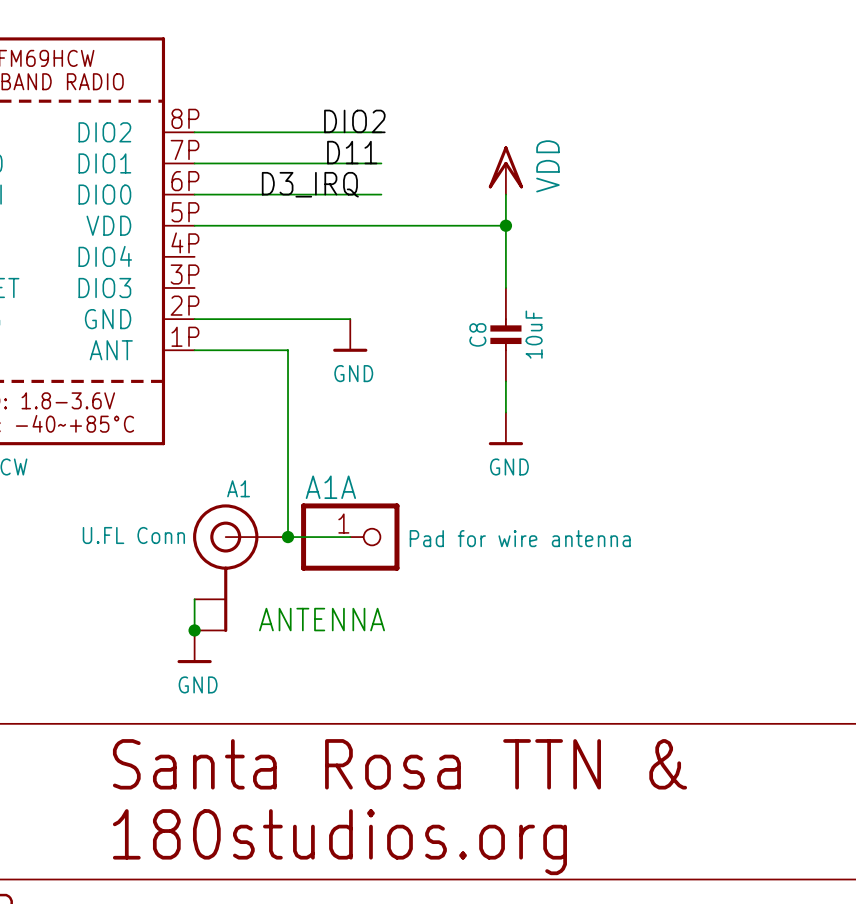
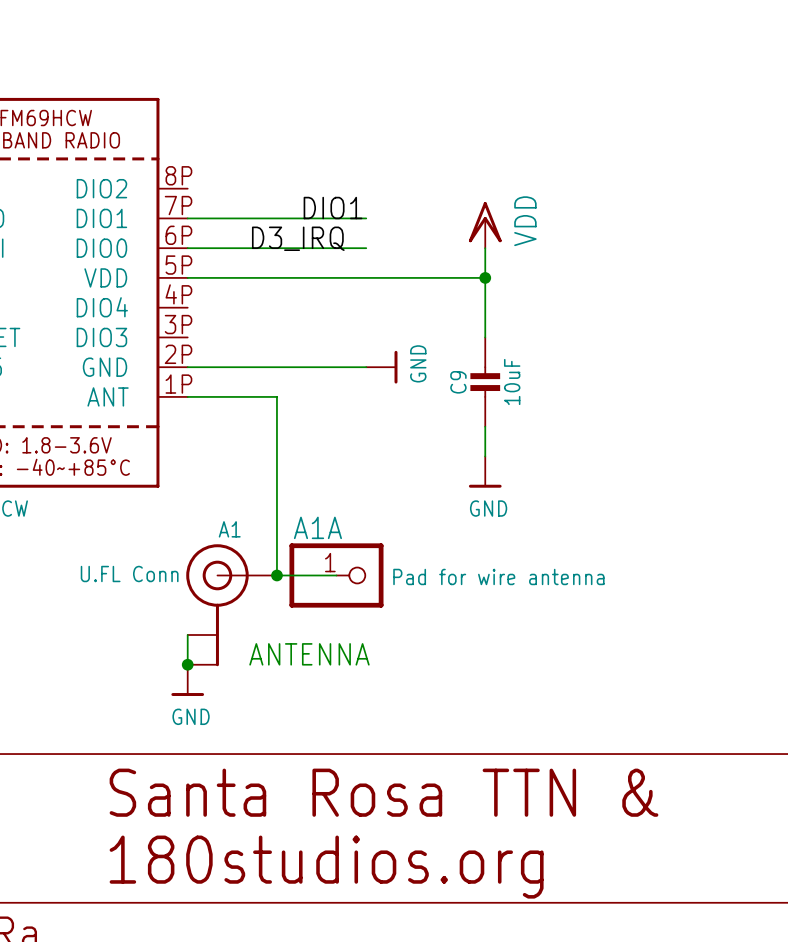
label: DIO2 (354, 121) -> none
wire: (194, 132) (381, 132) -> none
label: D11 (352, 152) -> DIO1 (333, 208)
wire: none -> (336, 367) (366, 367)
C8 name: C8 (477, 334) -> C9 (458, 382)
power symbol position: GND (350, 335) -> GND (381, 367)
power symbol rotation: 0° (350, 350) -> 90° counterclockwise (395, 367)

